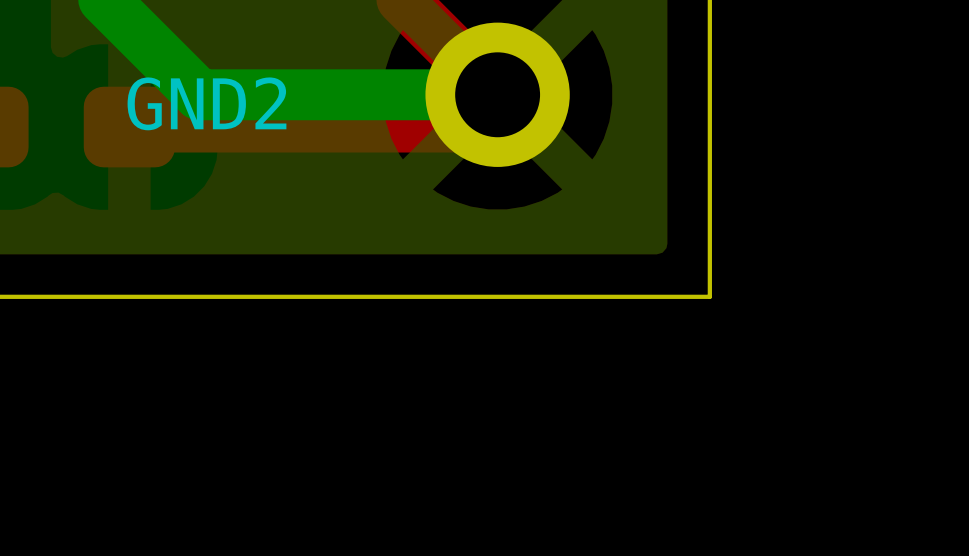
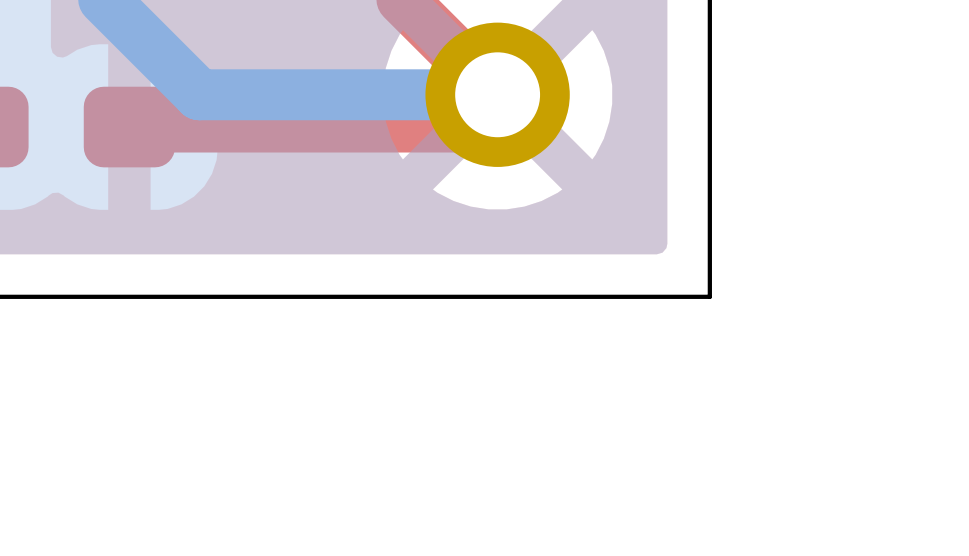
text: GND2 (206, 103) -> none

